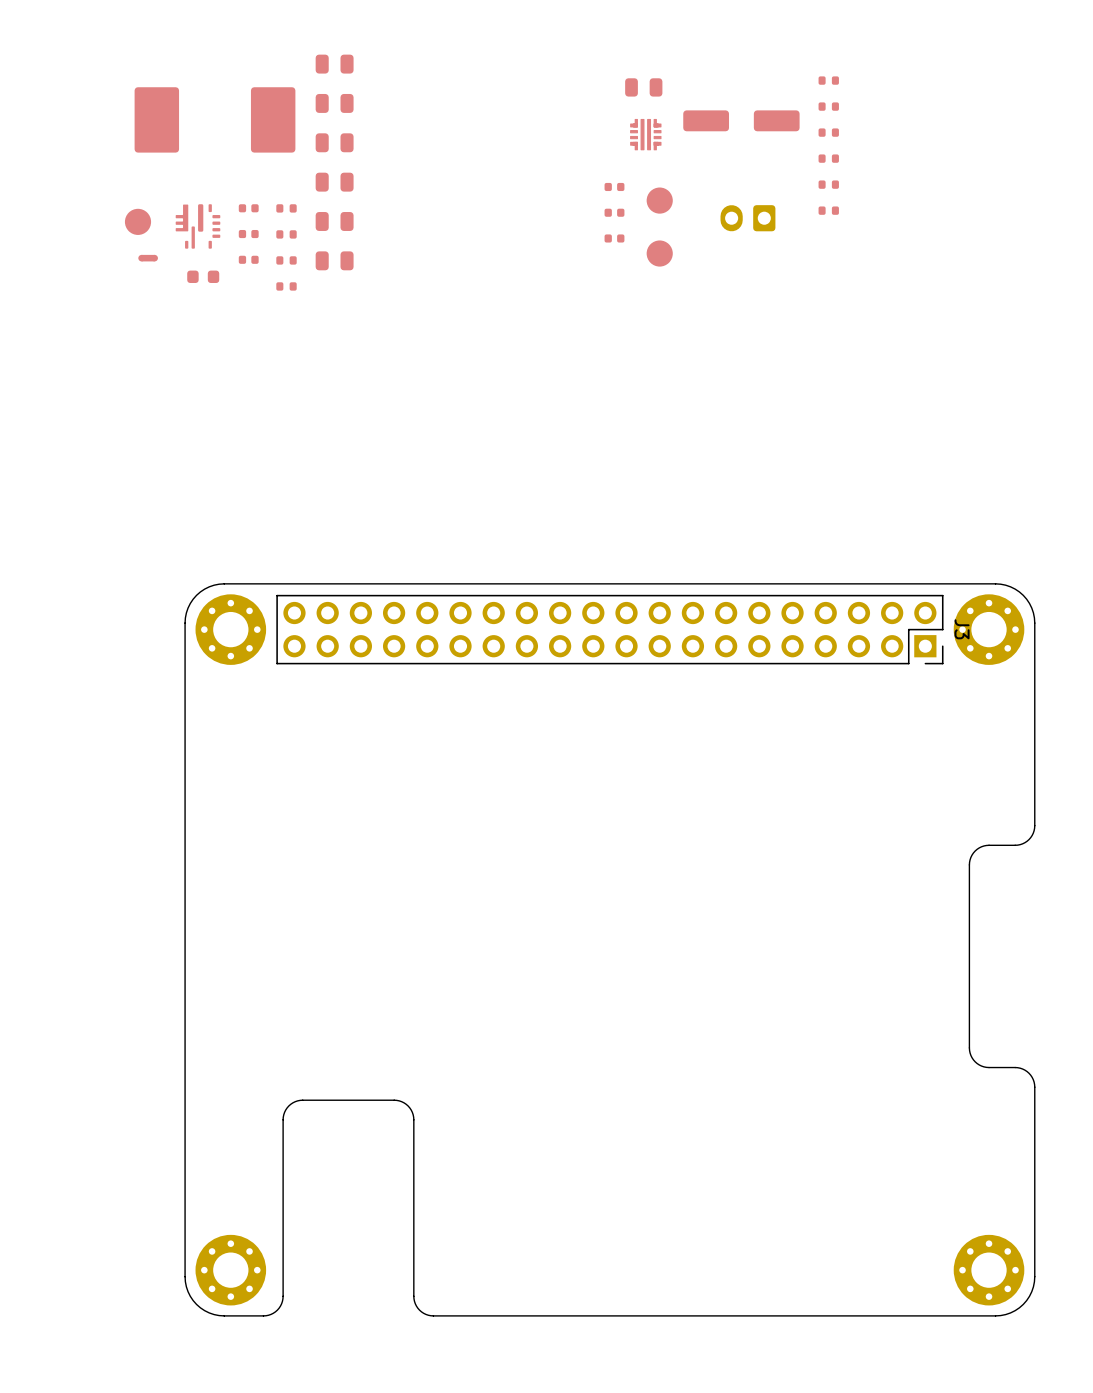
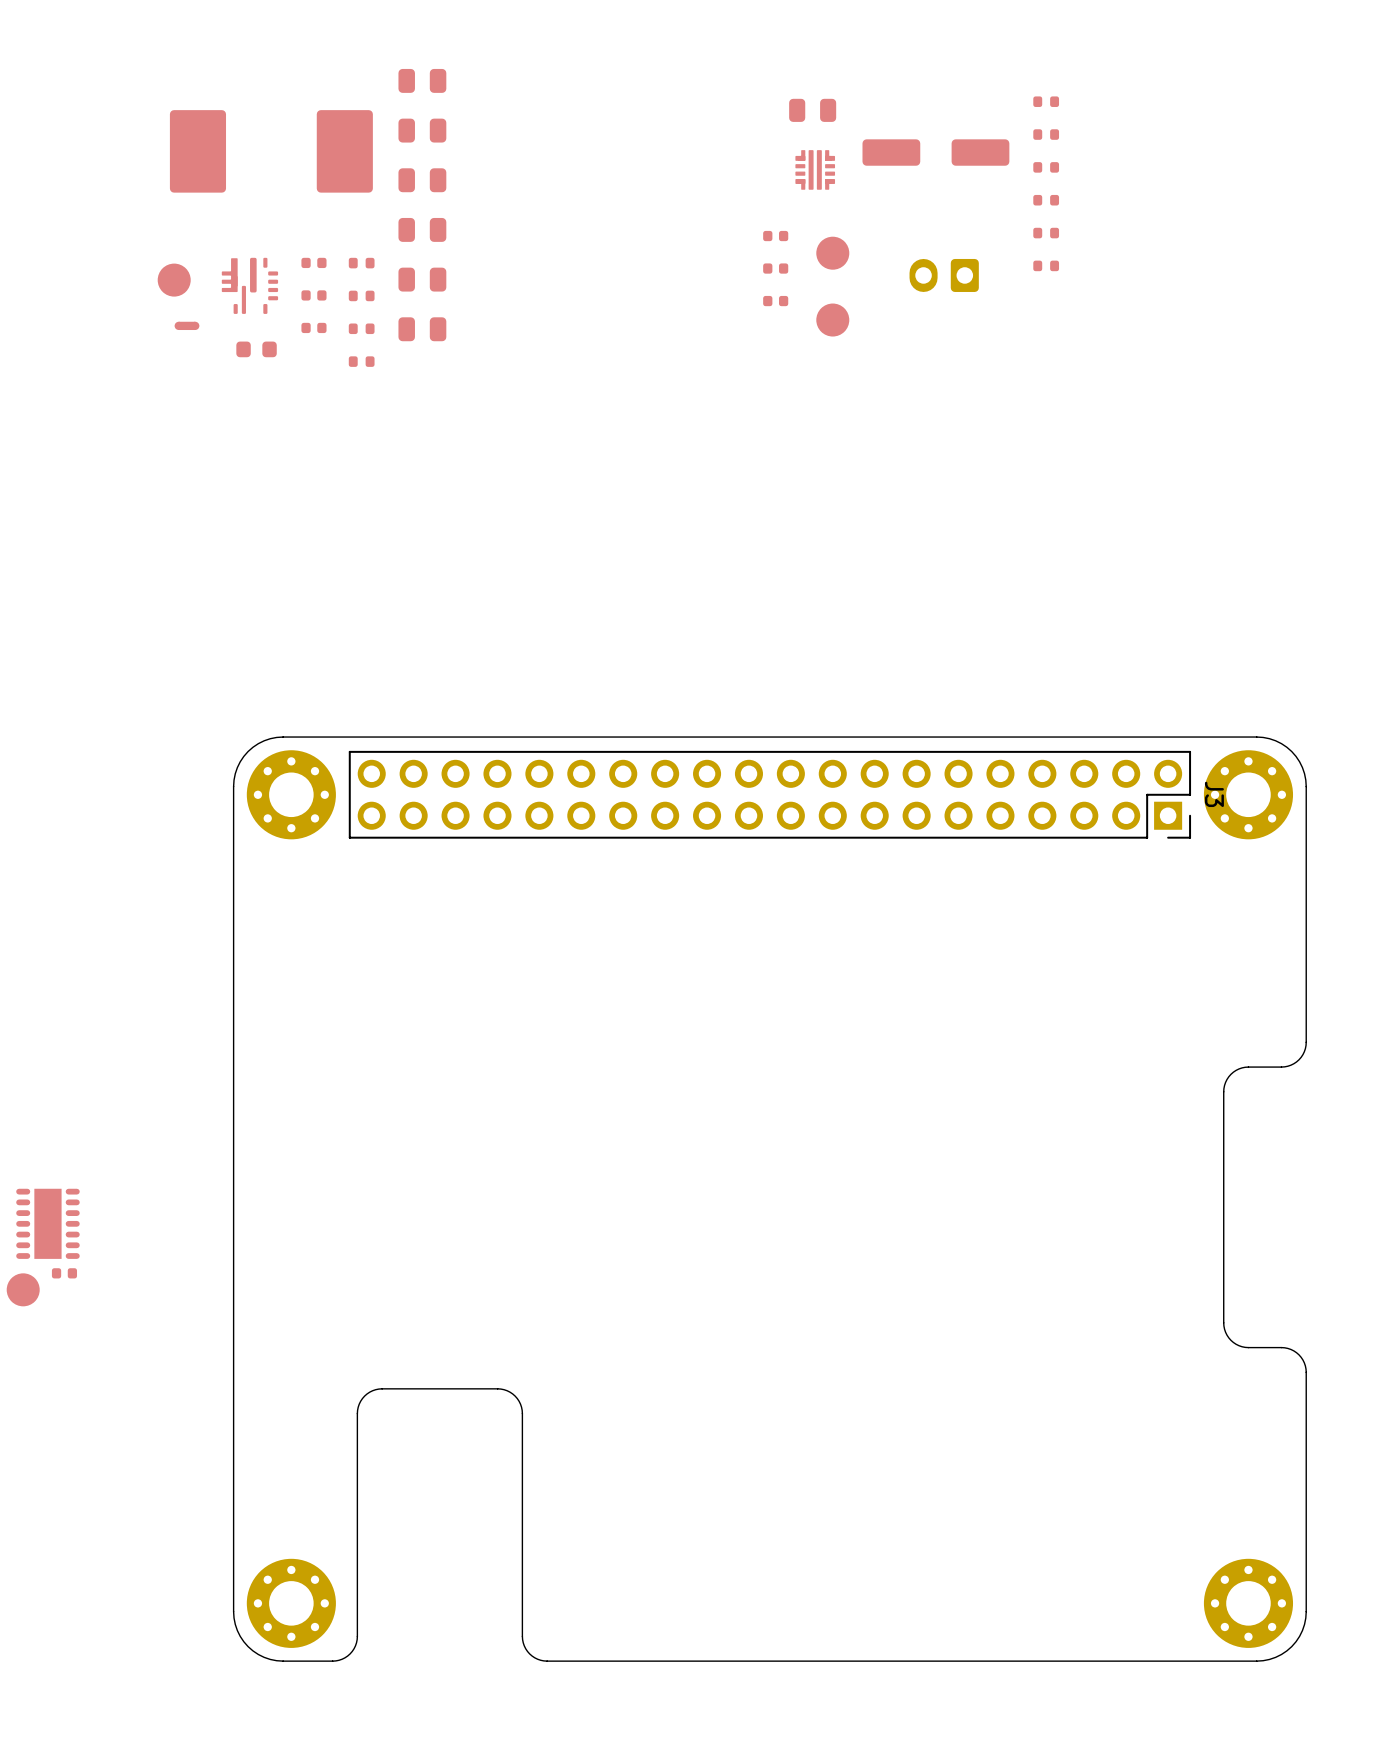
part: none -> (47, 1223)
part: none -> (64, 1273)
part: none -> (23, 1289)

